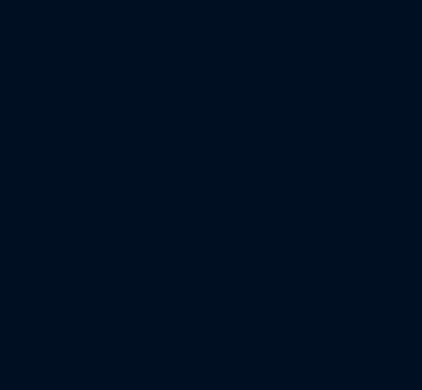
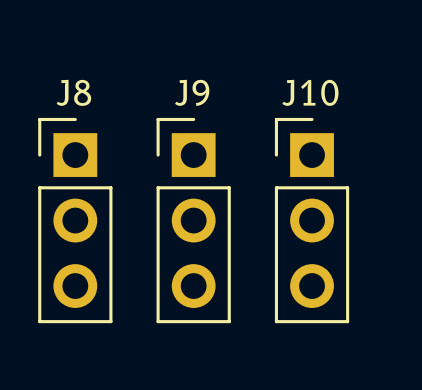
J8: none -> (75, 220)
J9: none -> (193, 220)
J10: none -> (312, 220)

